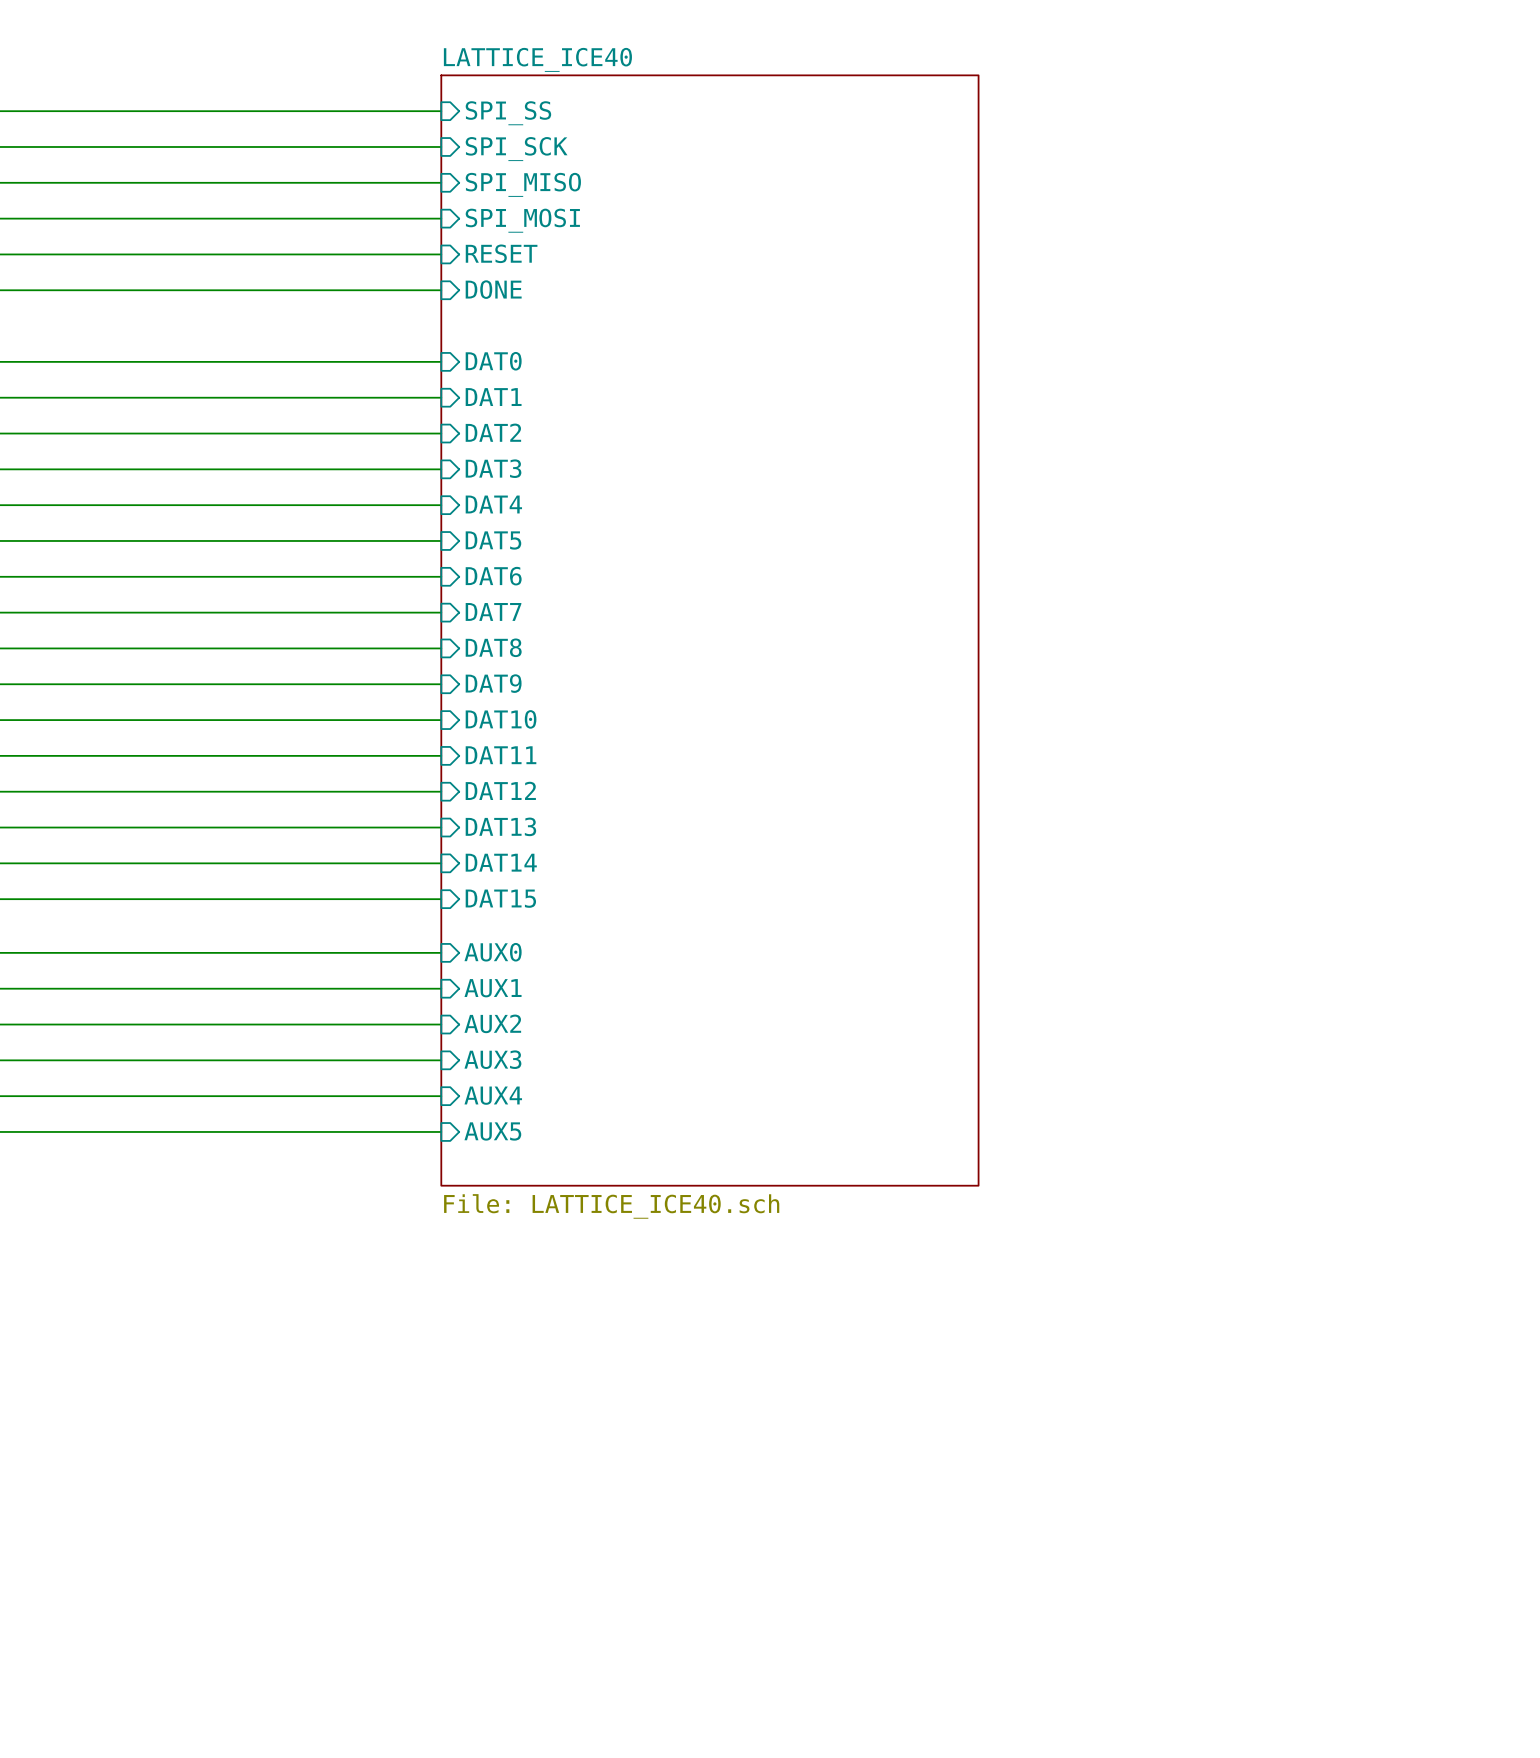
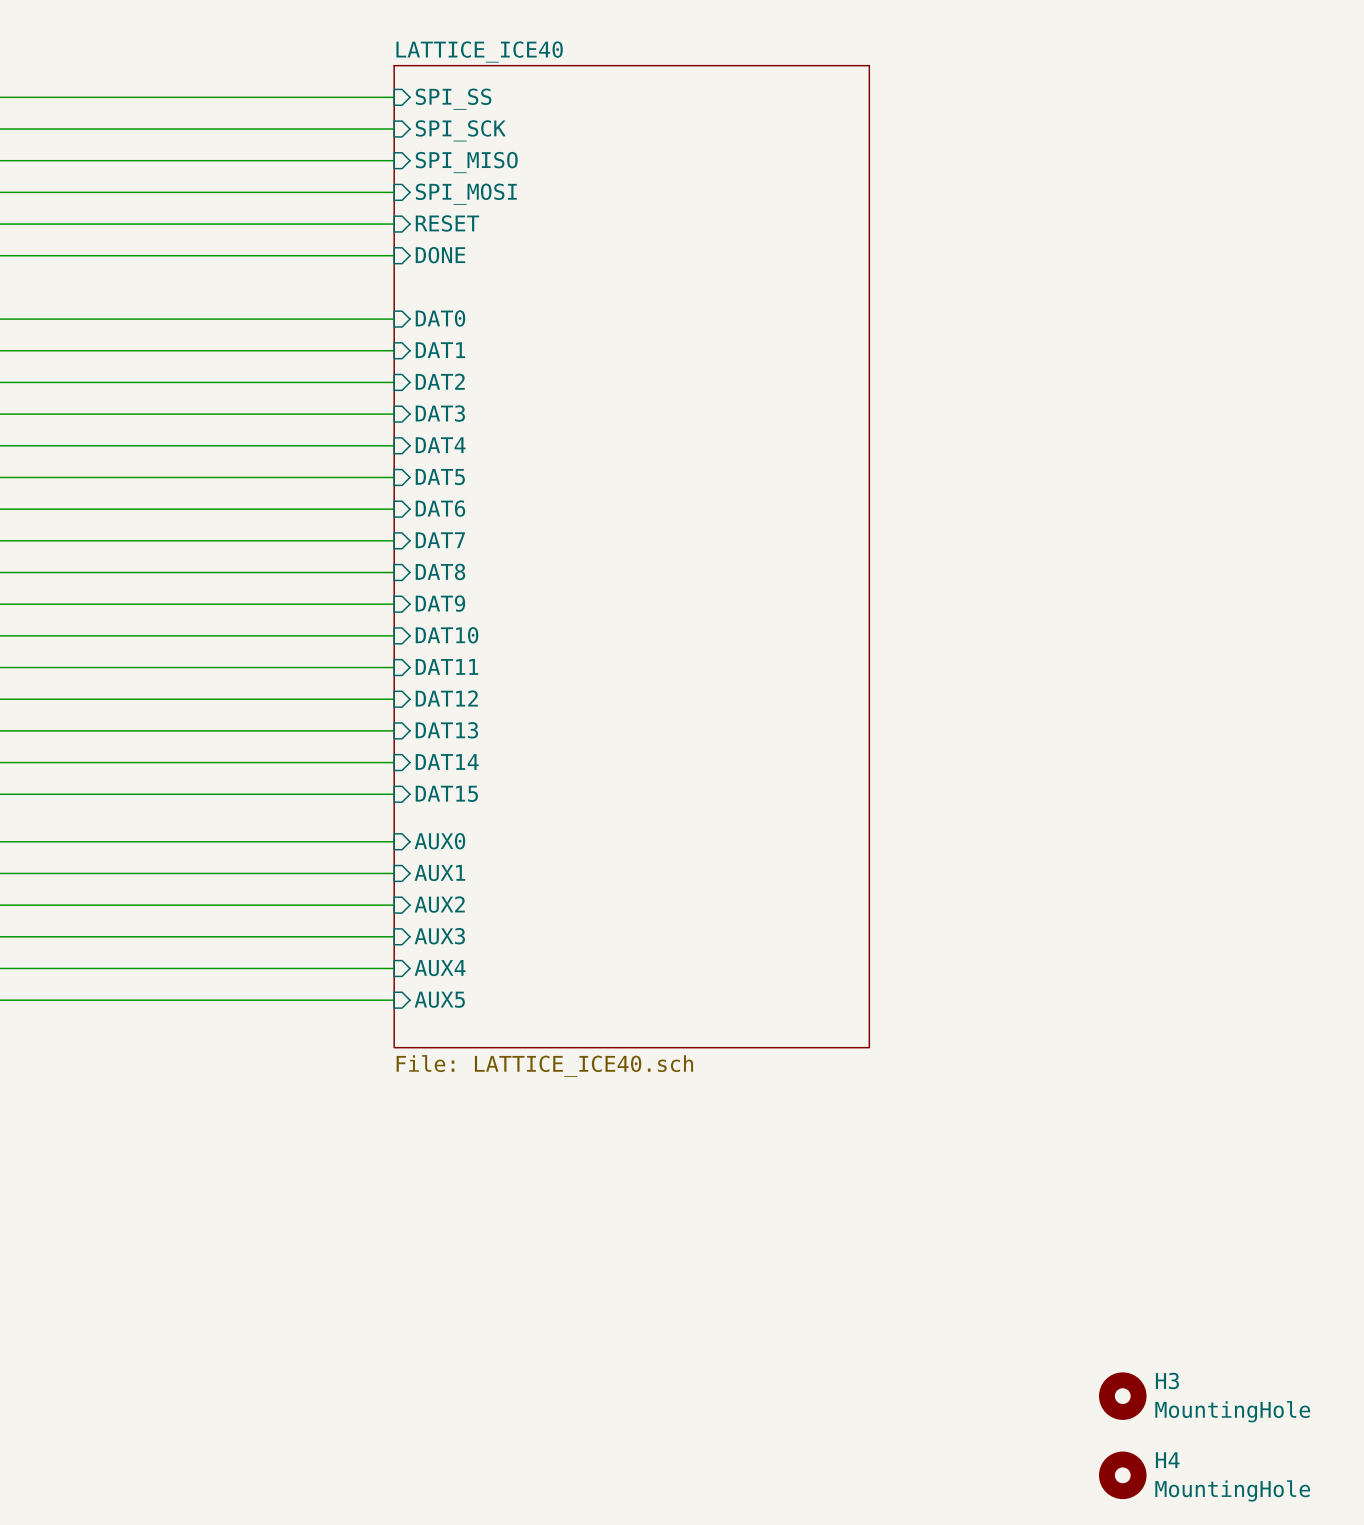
H3: none -> MountingHole (1122, 1396)
H4: none -> MountingHole (1122, 1475)

